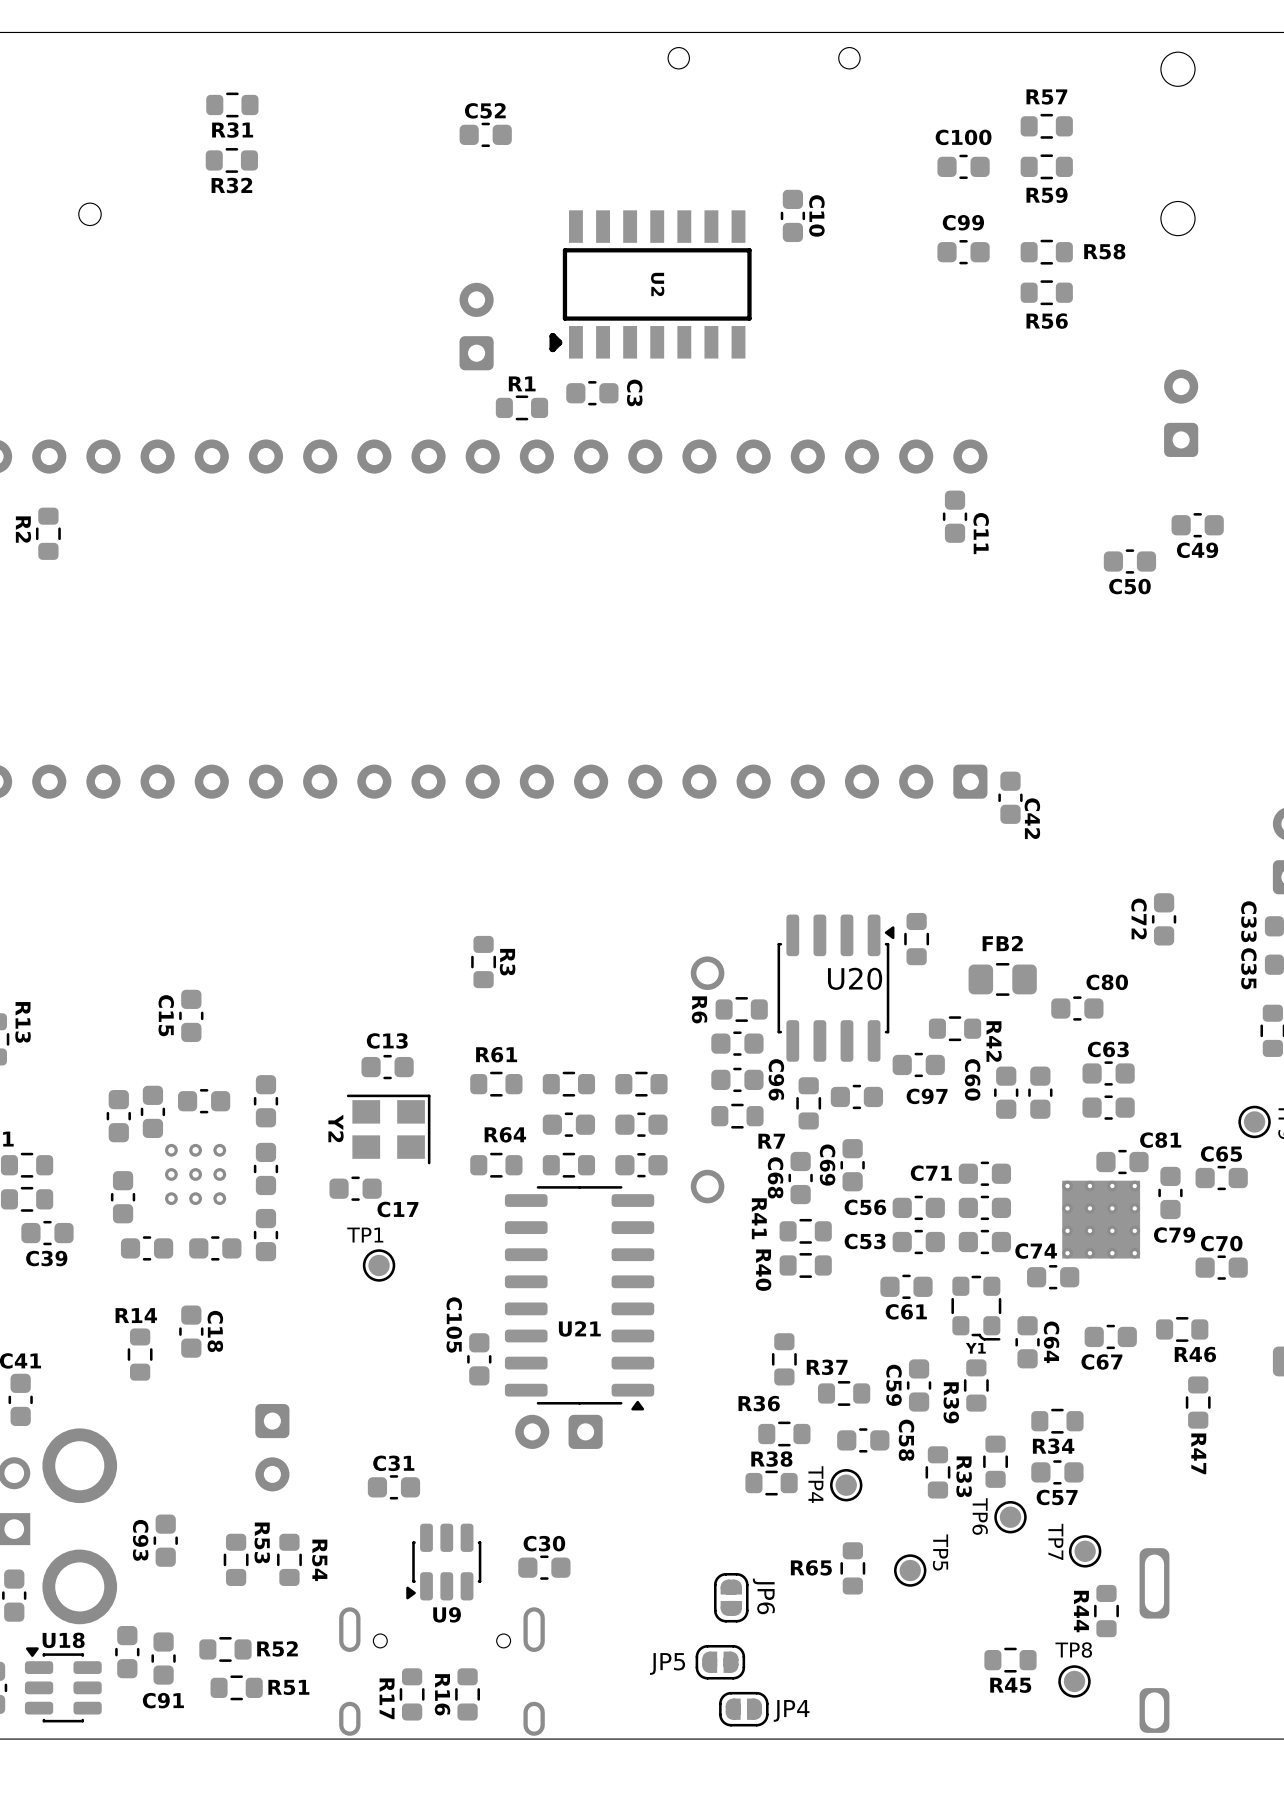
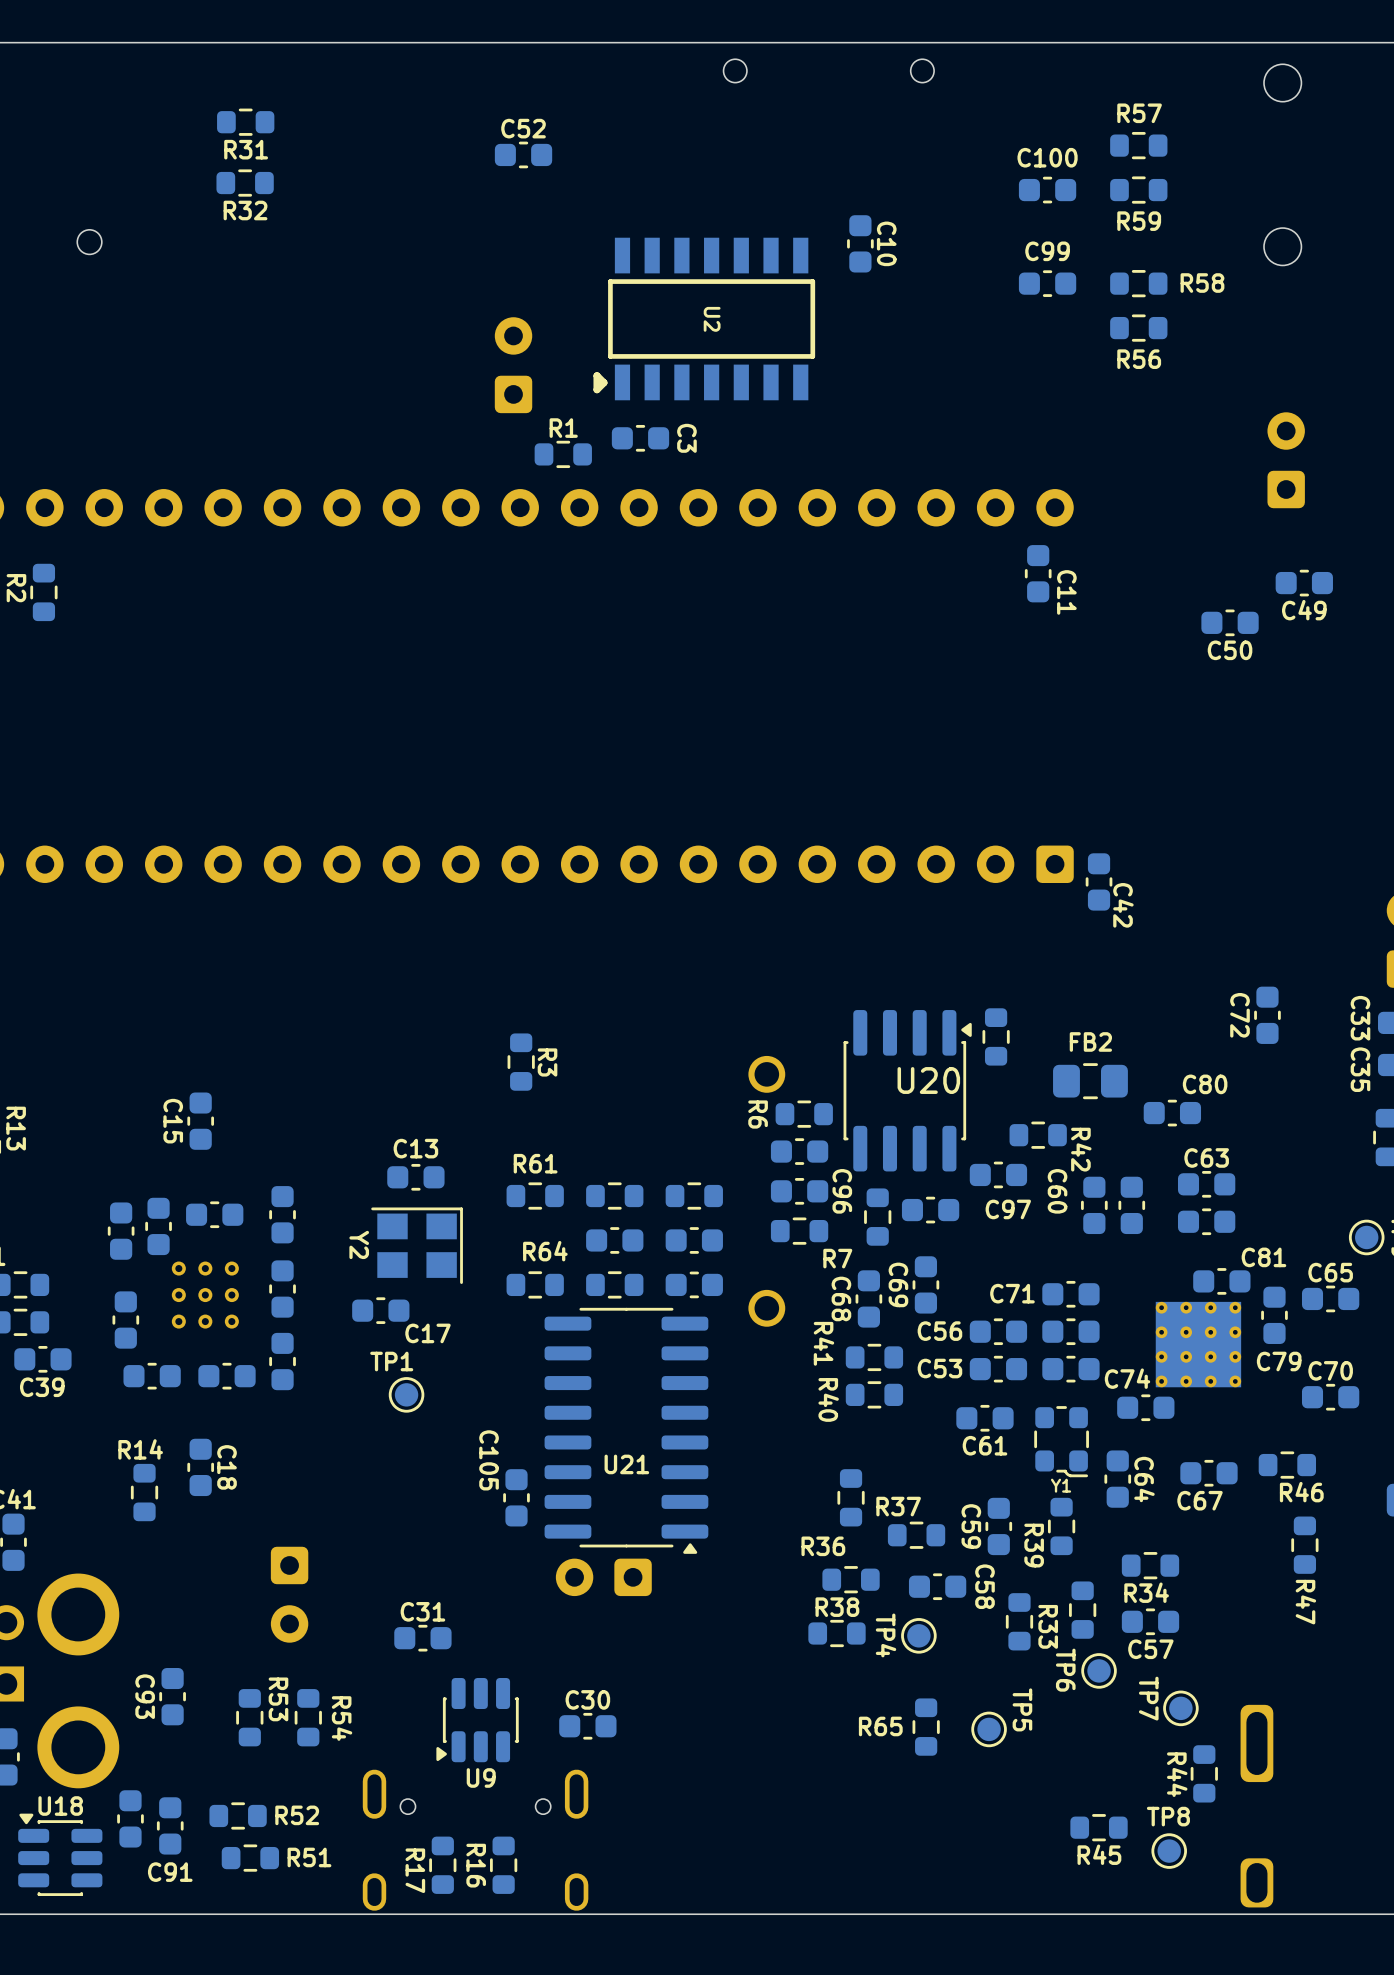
JP6: (731, 1597) -> none
JP5: (720, 1662) -> none
JP4: (743, 1709) -> none

